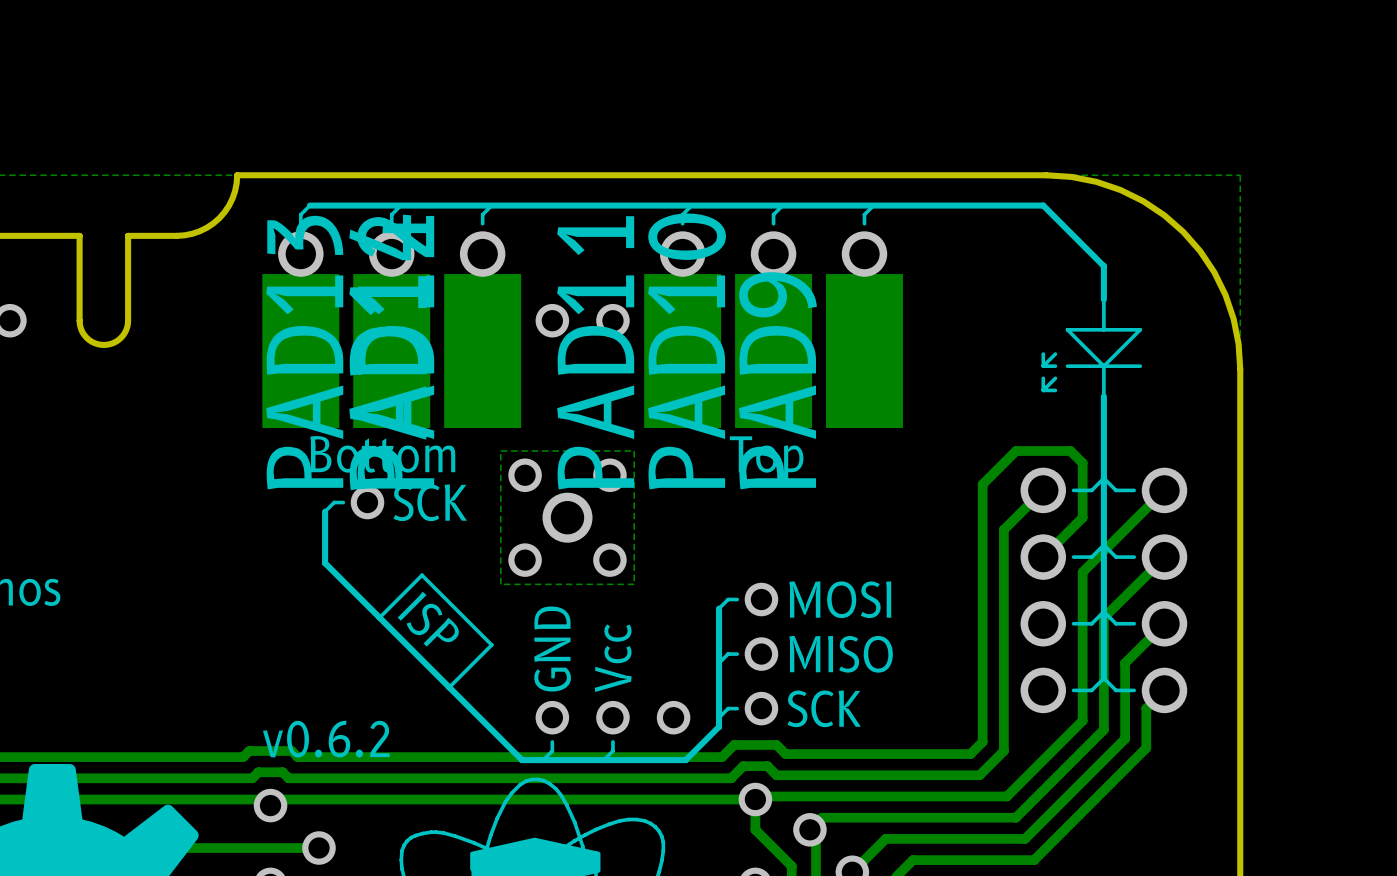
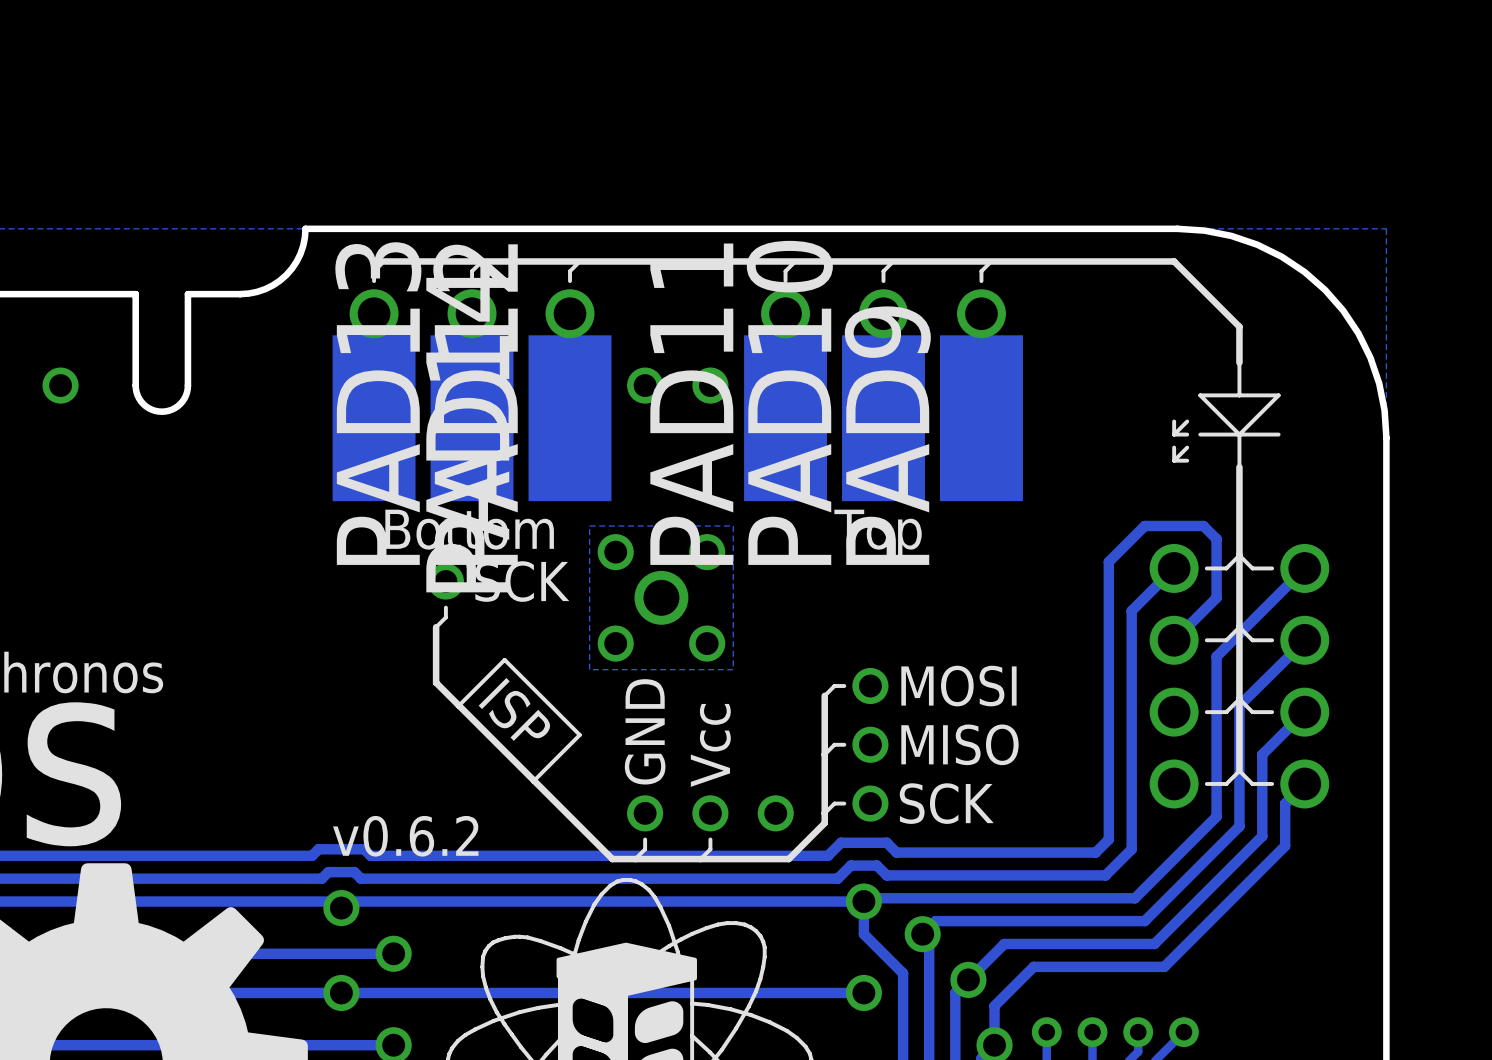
line: (343, 502) (334, 502) (325, 511) (325, 563) (358, 596) -> (445, 607) (445, 617) (436, 627) (436, 682)

